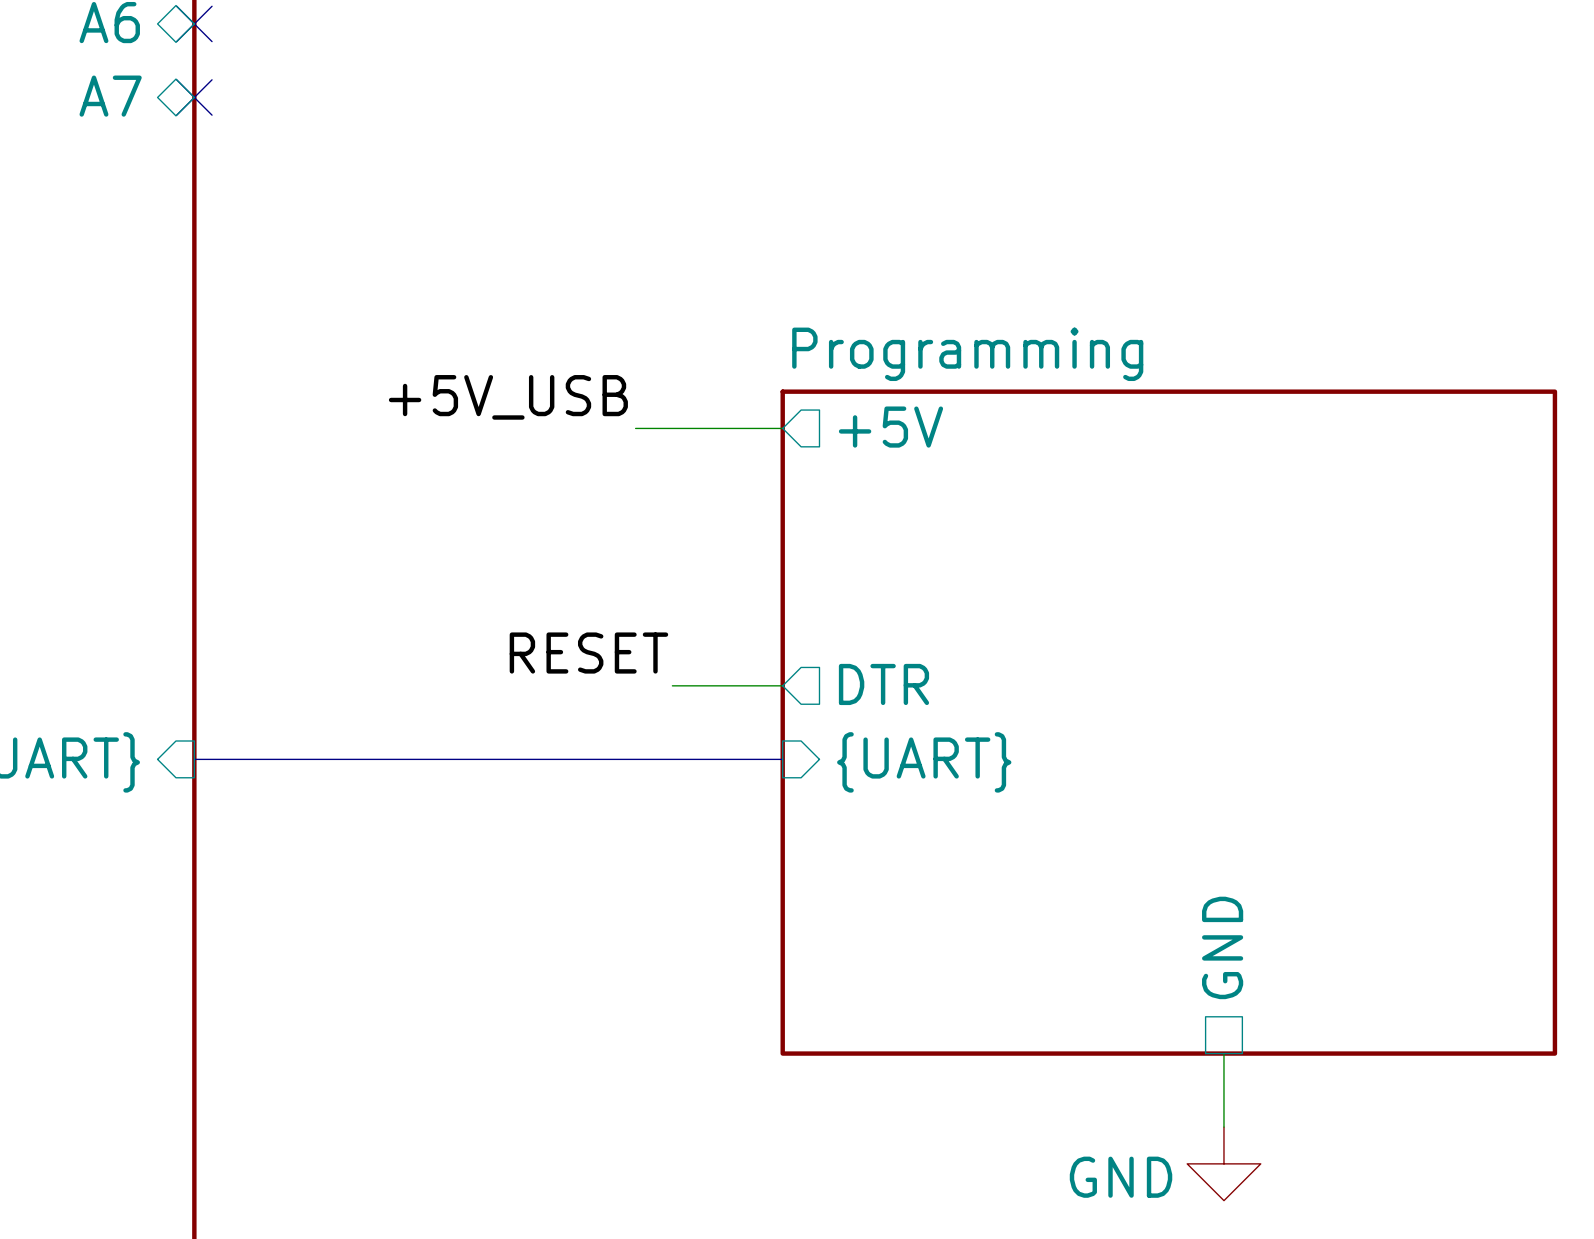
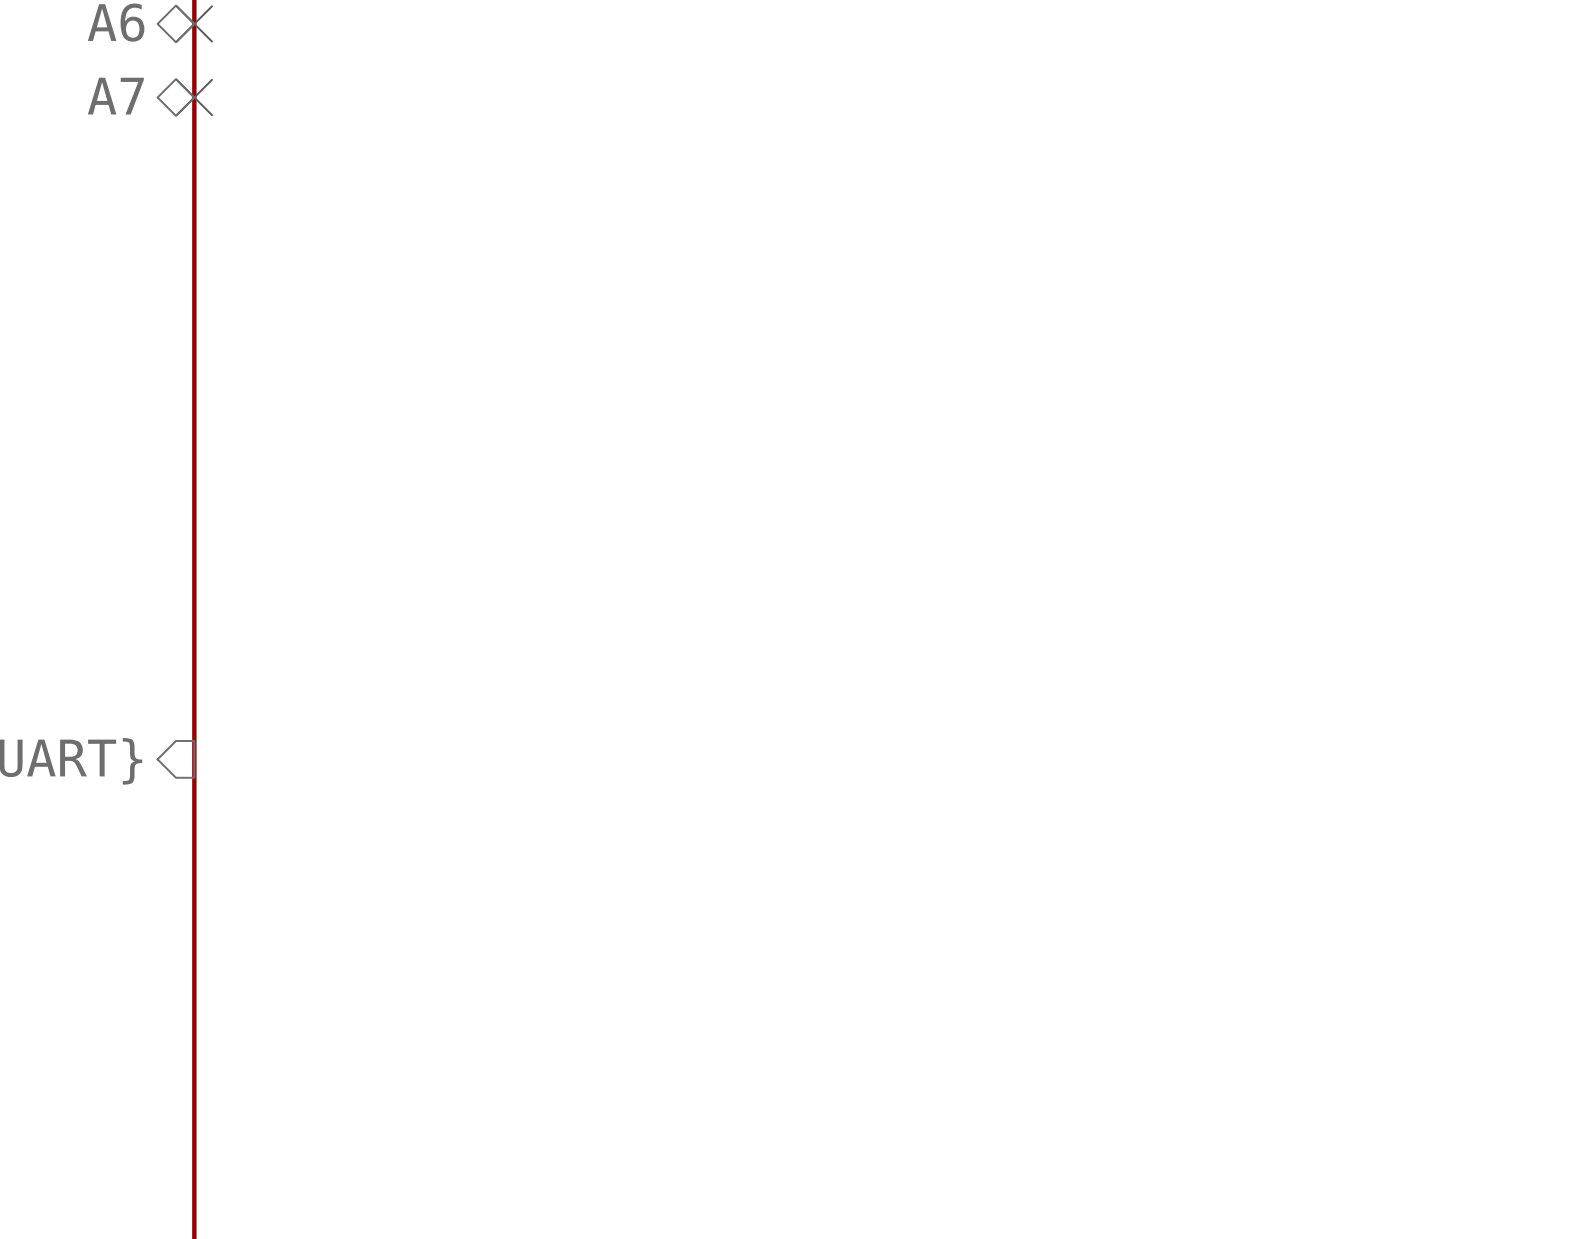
label: +5V_USB (508, 397) -> none
sheet pin: +5V (890, 427) -> none
wire: (635, 428) (782, 428) -> none
label: RESET (588, 653) -> none
sheet pin: DTR (883, 684) -> none
wire: (672, 685) (782, 685) -> none
sheet Programming: (1168, 722) -> none
bus: (194, 759) (782, 759) -> none
sheet pin: {UART} (924, 762) -> none
sheet pin: GND (1222, 947) -> none
wire: (1223, 1053) (1223, 1127) -> none
power symbol: GND (1223, 1163) -> none

